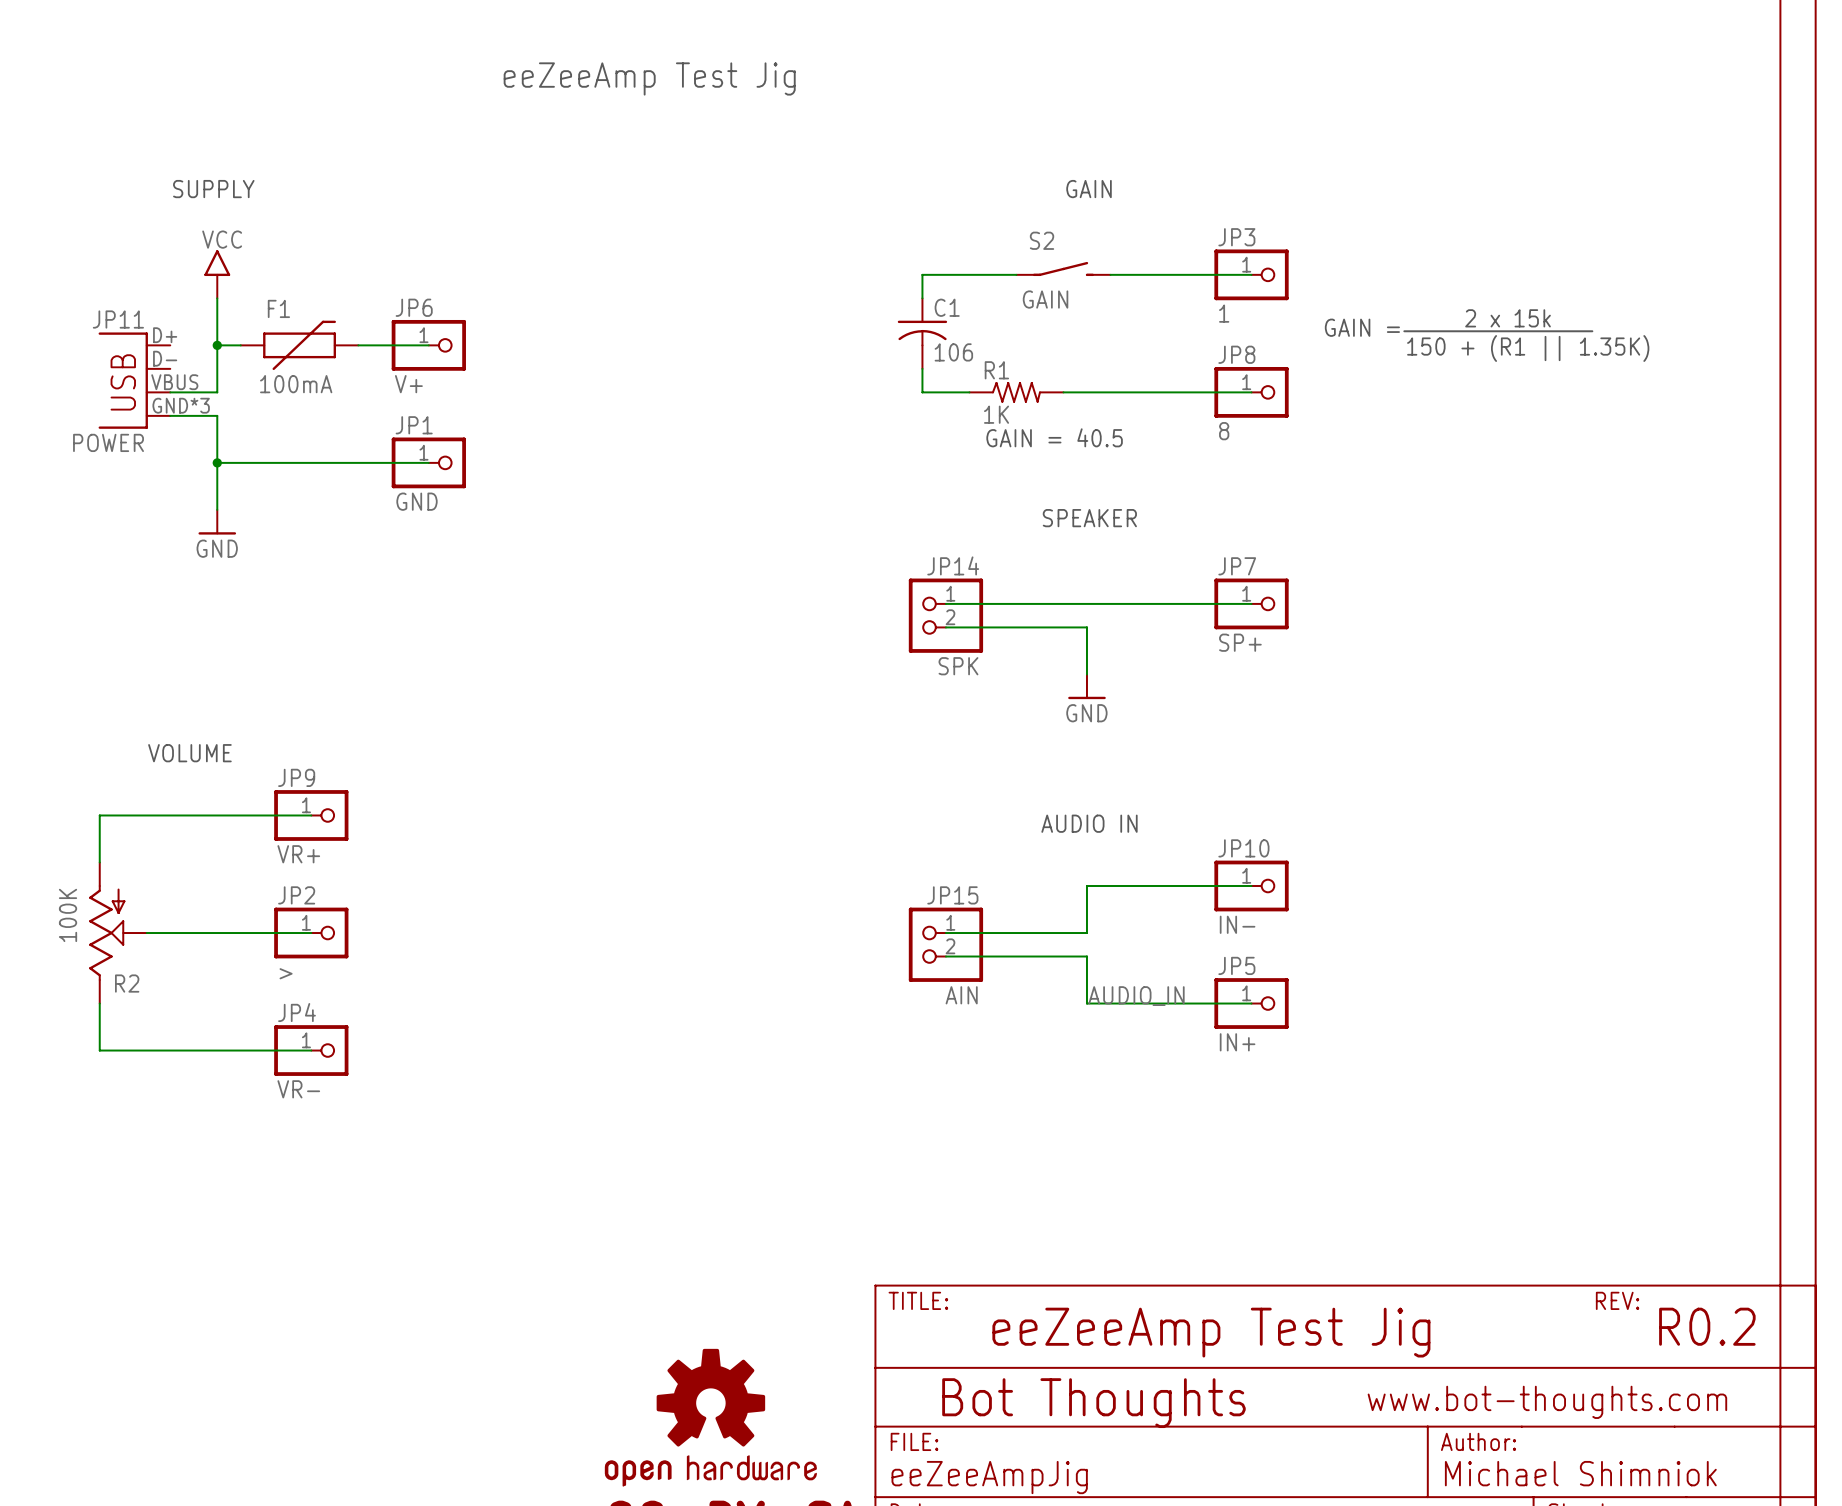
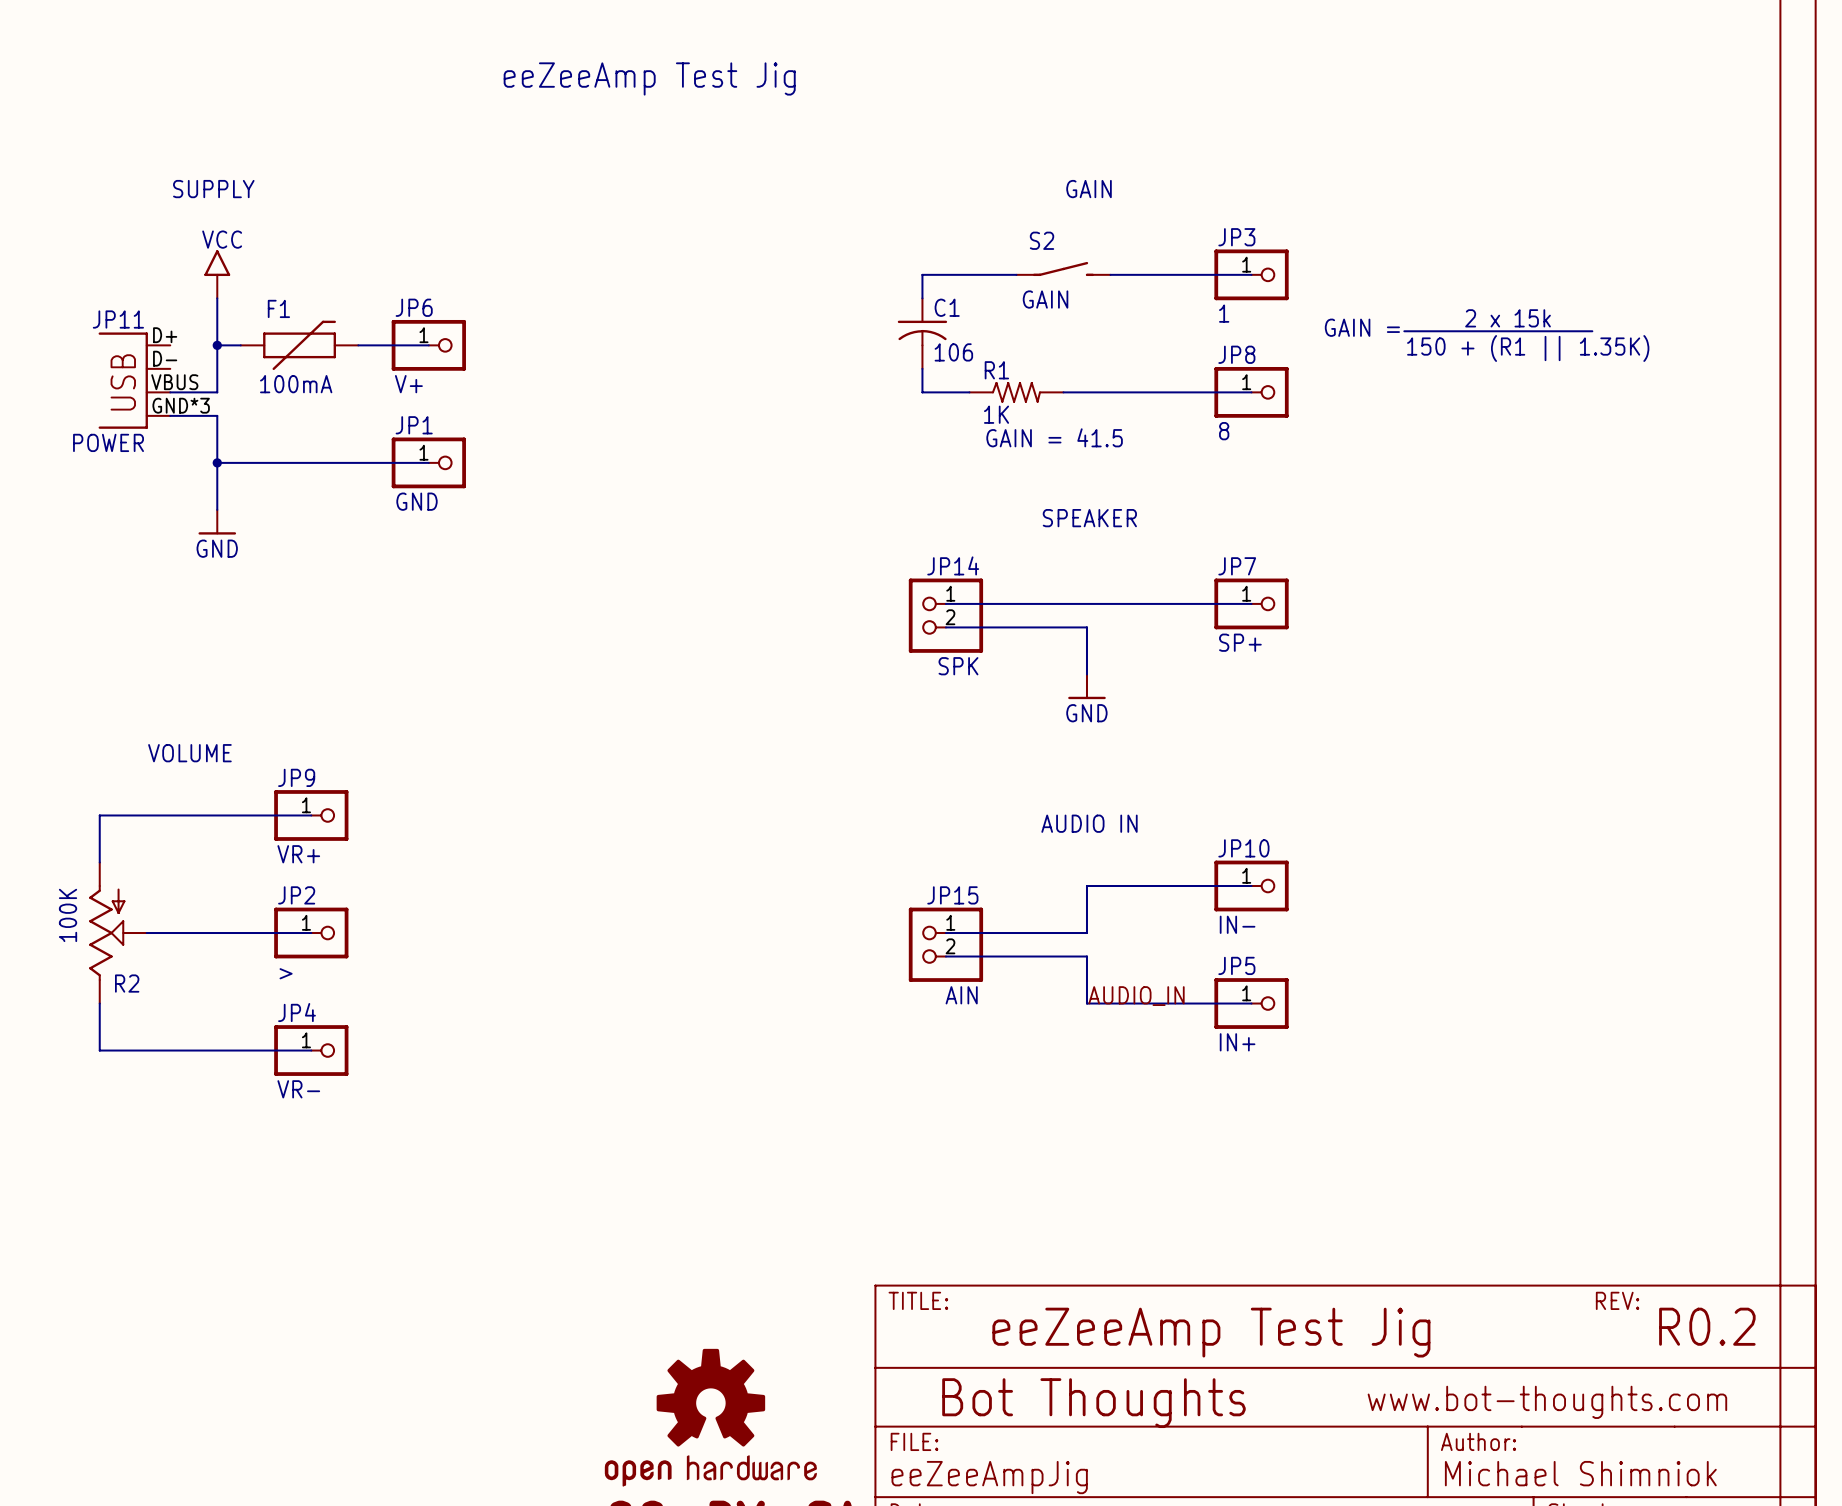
text: GAIN = 40.5 (1054, 437) -> GAIN = 41.5 (1054, 437)

